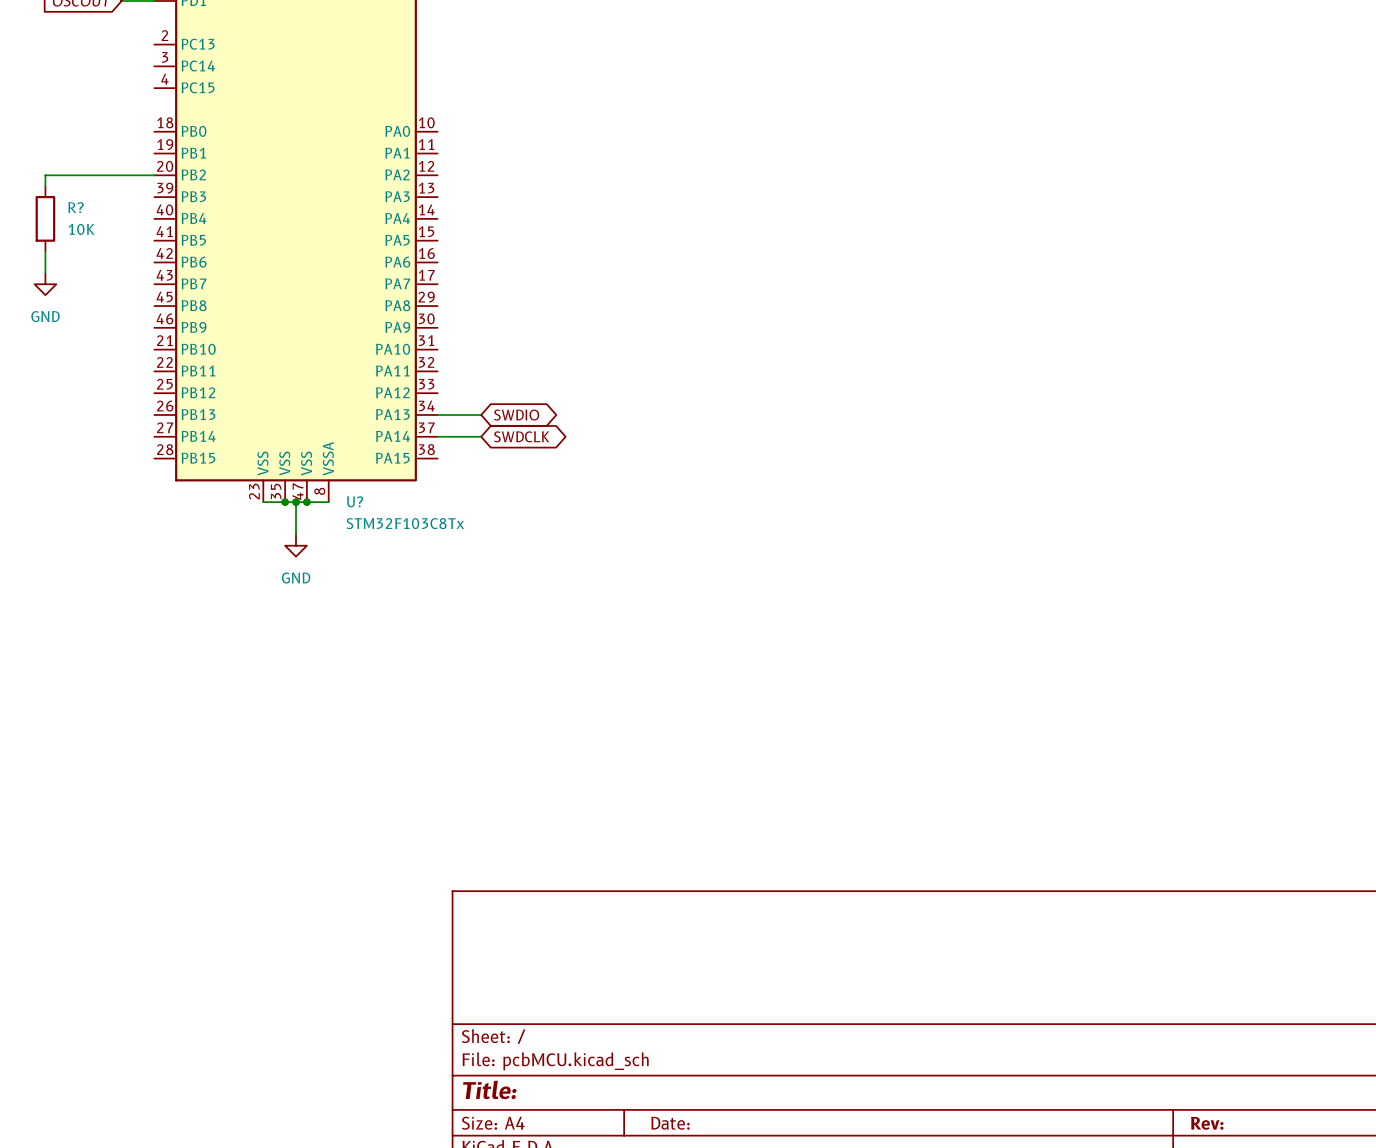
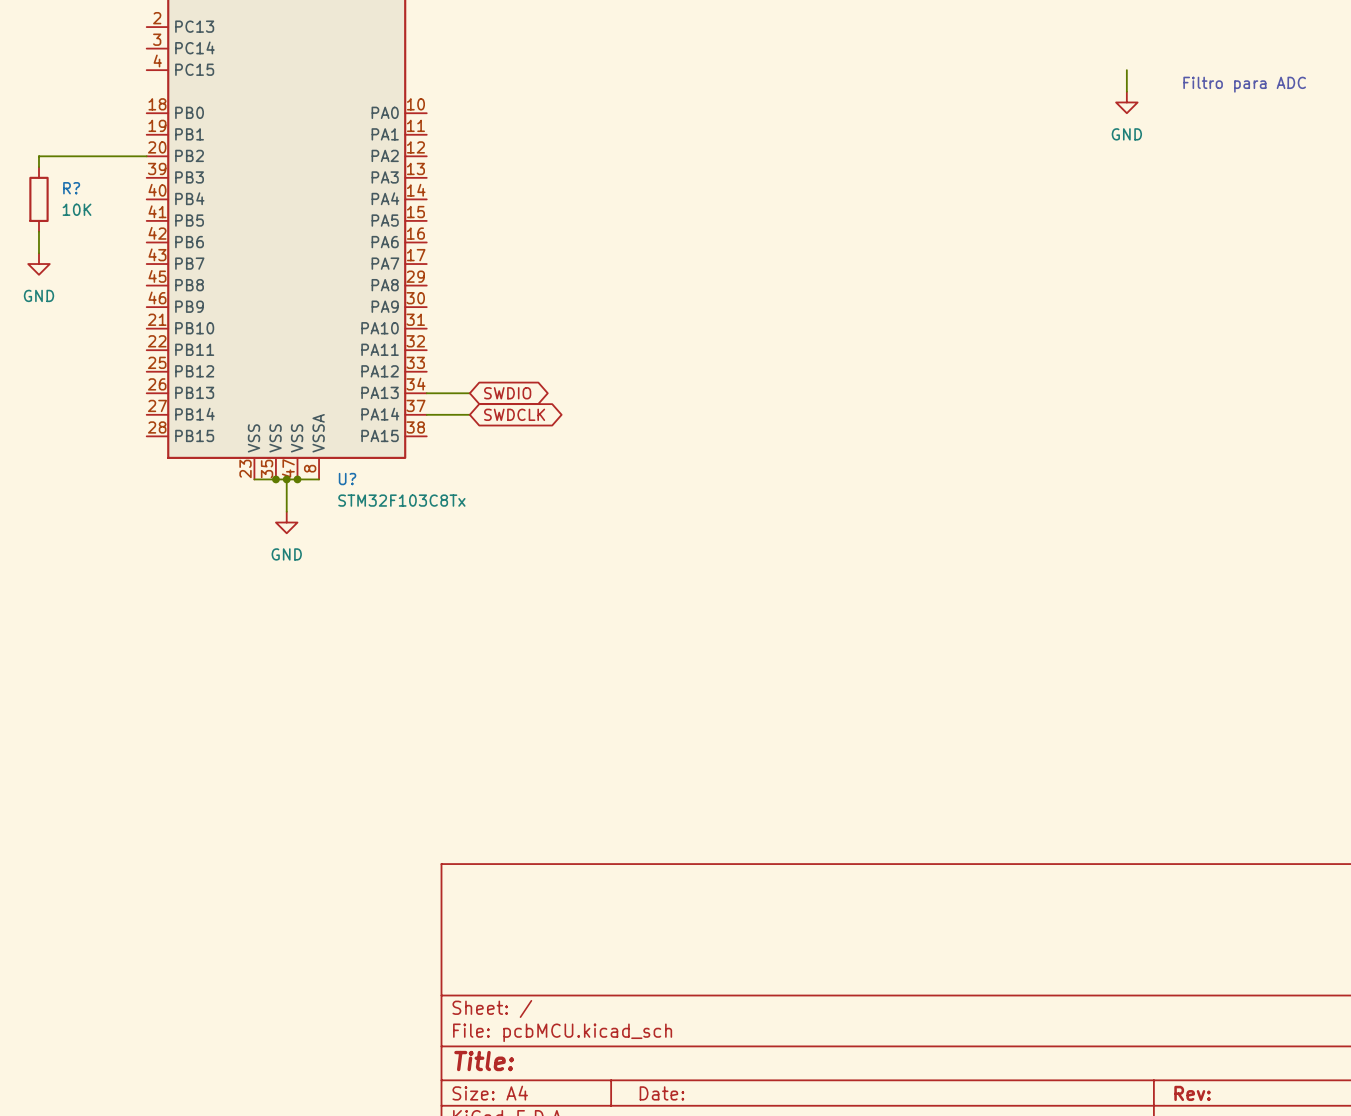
wire: none -> (1126, 70) (1126, 91)
text: none -> Filtro para ADC (1244, 84)
power symbol: none -> GND (1126, 102)

